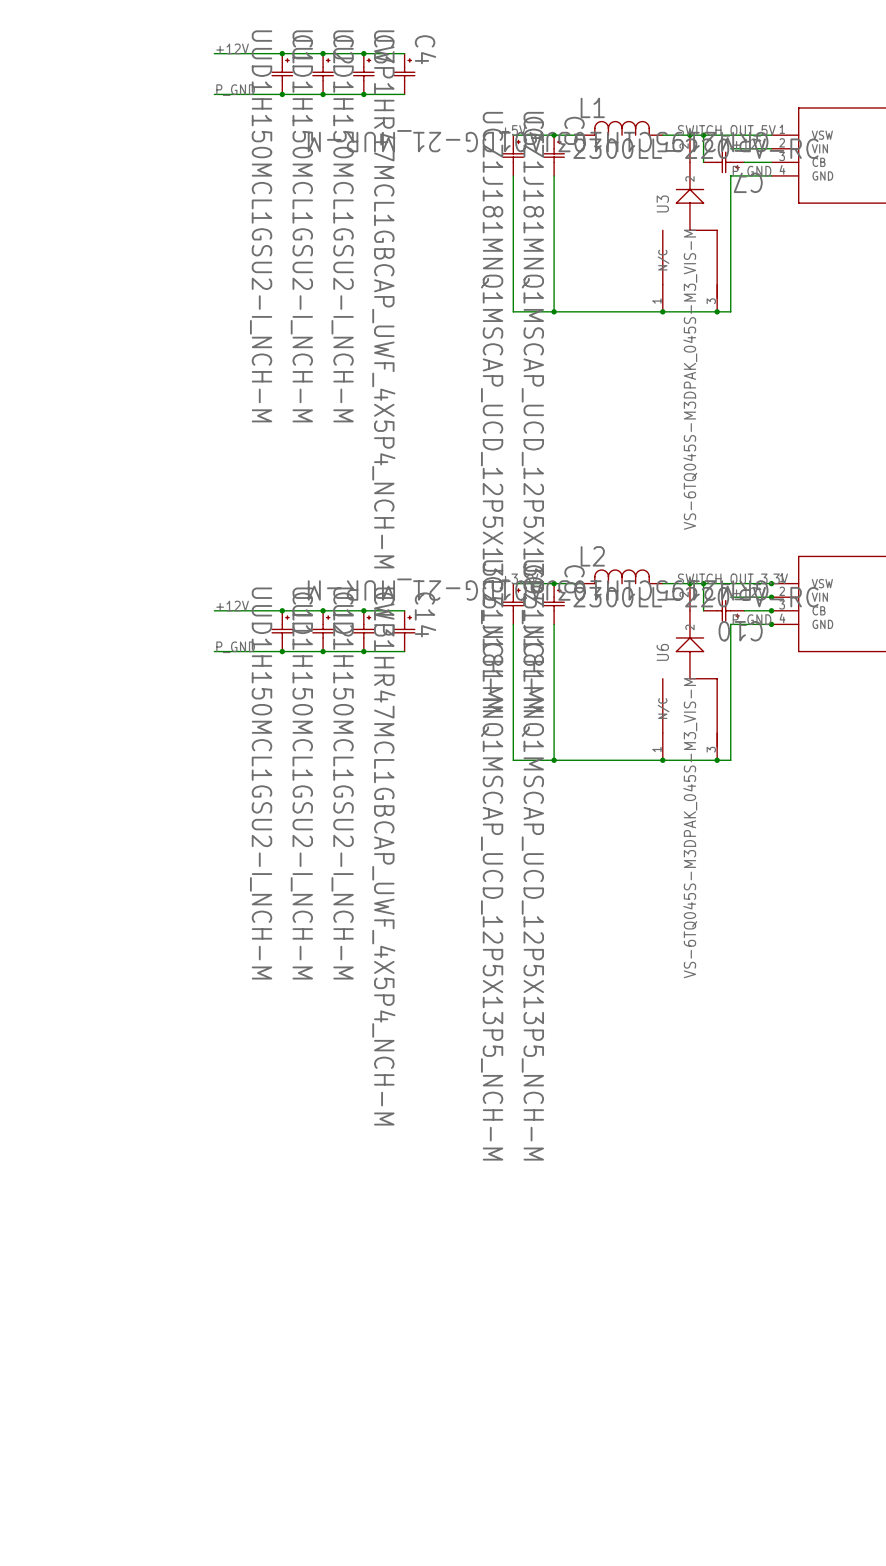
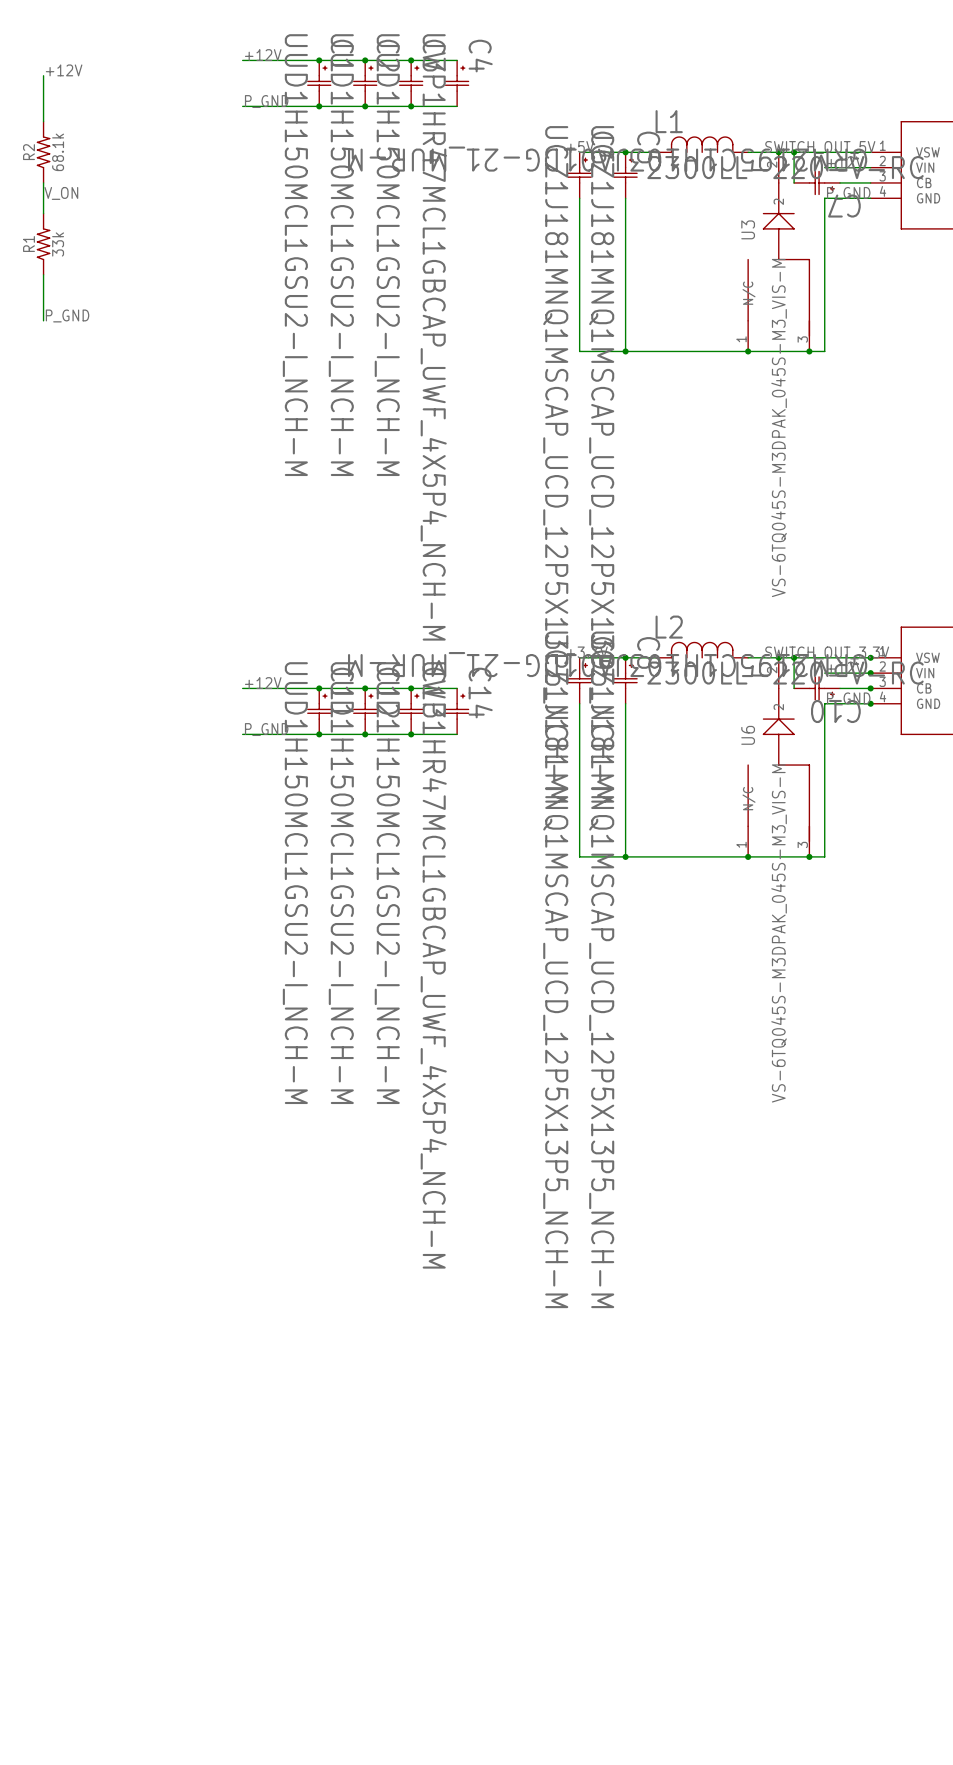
label: none -> +12V (64, 70)
wire: none -> (43, 75) (43, 121)
R2: none -> 68.1k (43, 152)
wire: none -> (43, 182) (43, 213)
label: none -> V_ON (61, 193)
R1: none -> 33k (43, 244)
wire: none -> (43, 274) (43, 320)
label: none -> P_GND (67, 315)

